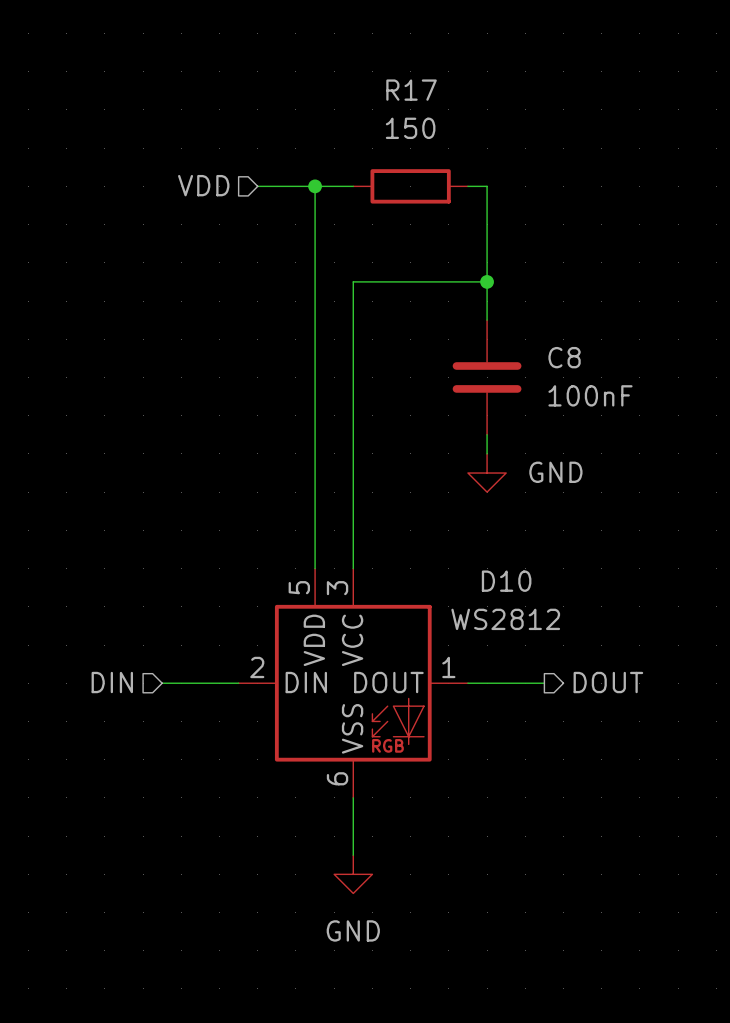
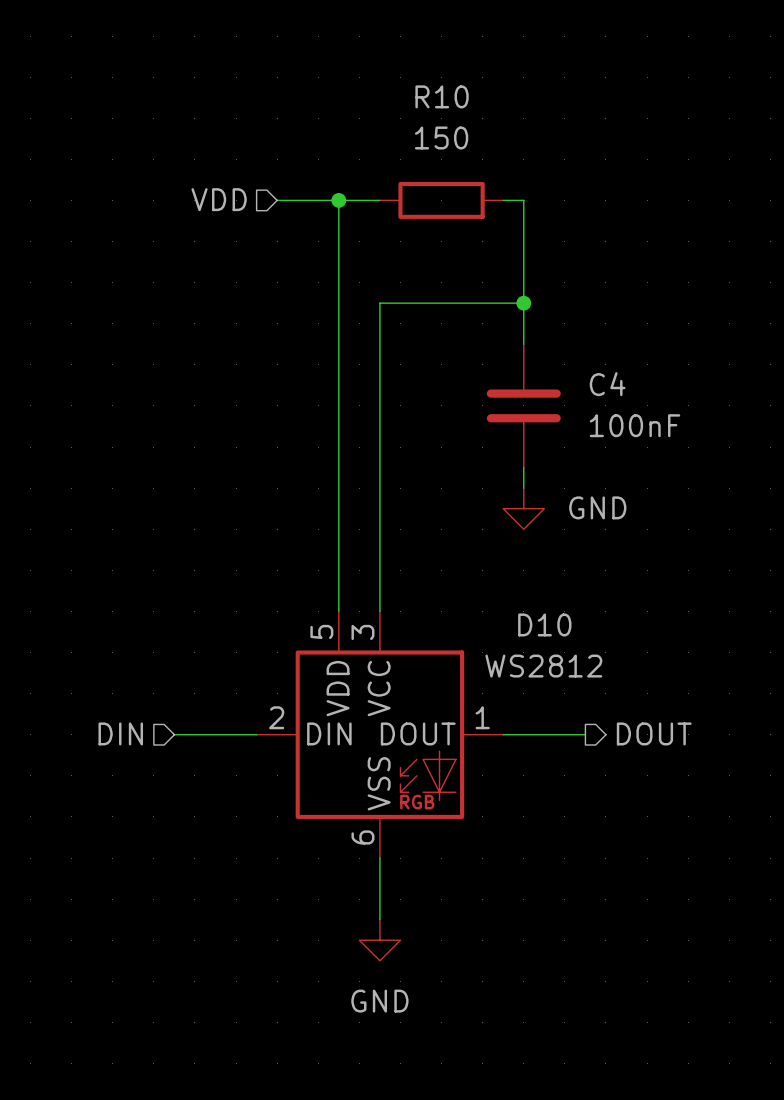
R17 name: R17 (411, 90) -> R10 (442, 96)
C8 name: C8 (564, 357) -> C4 (607, 384)

